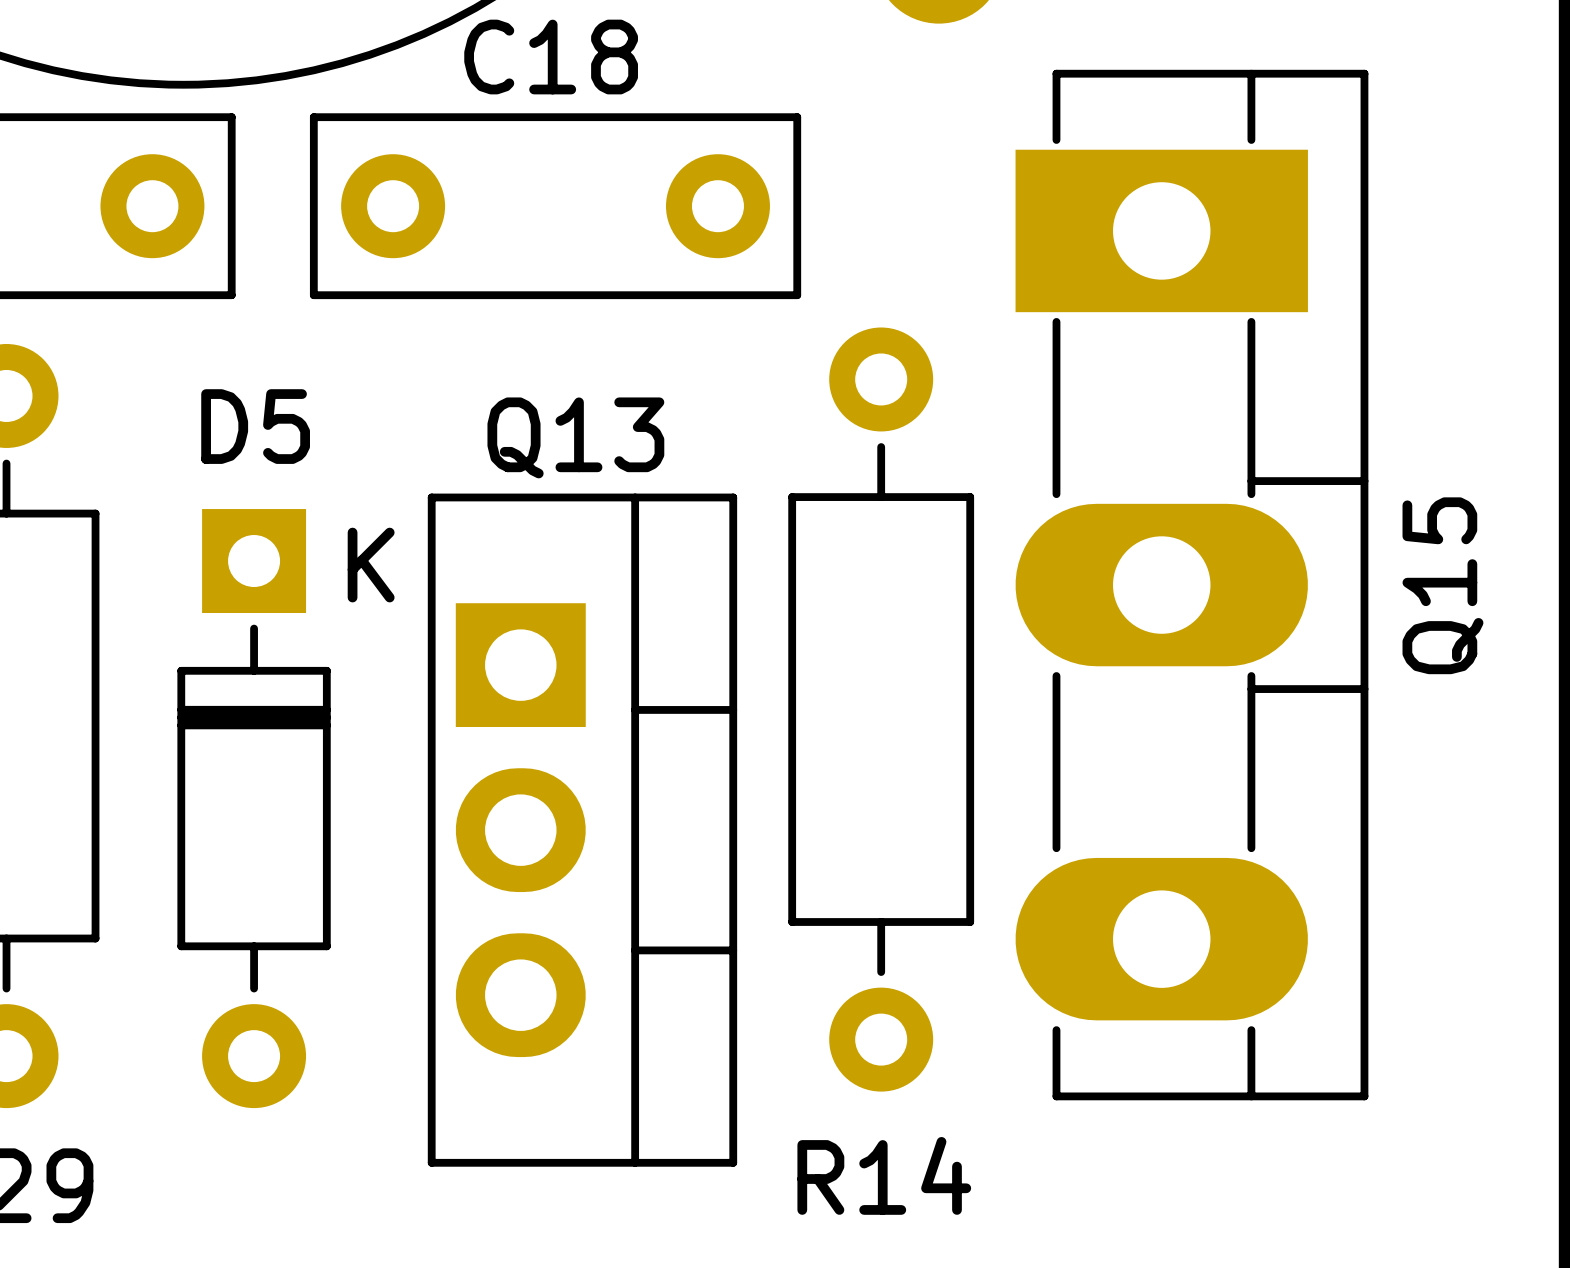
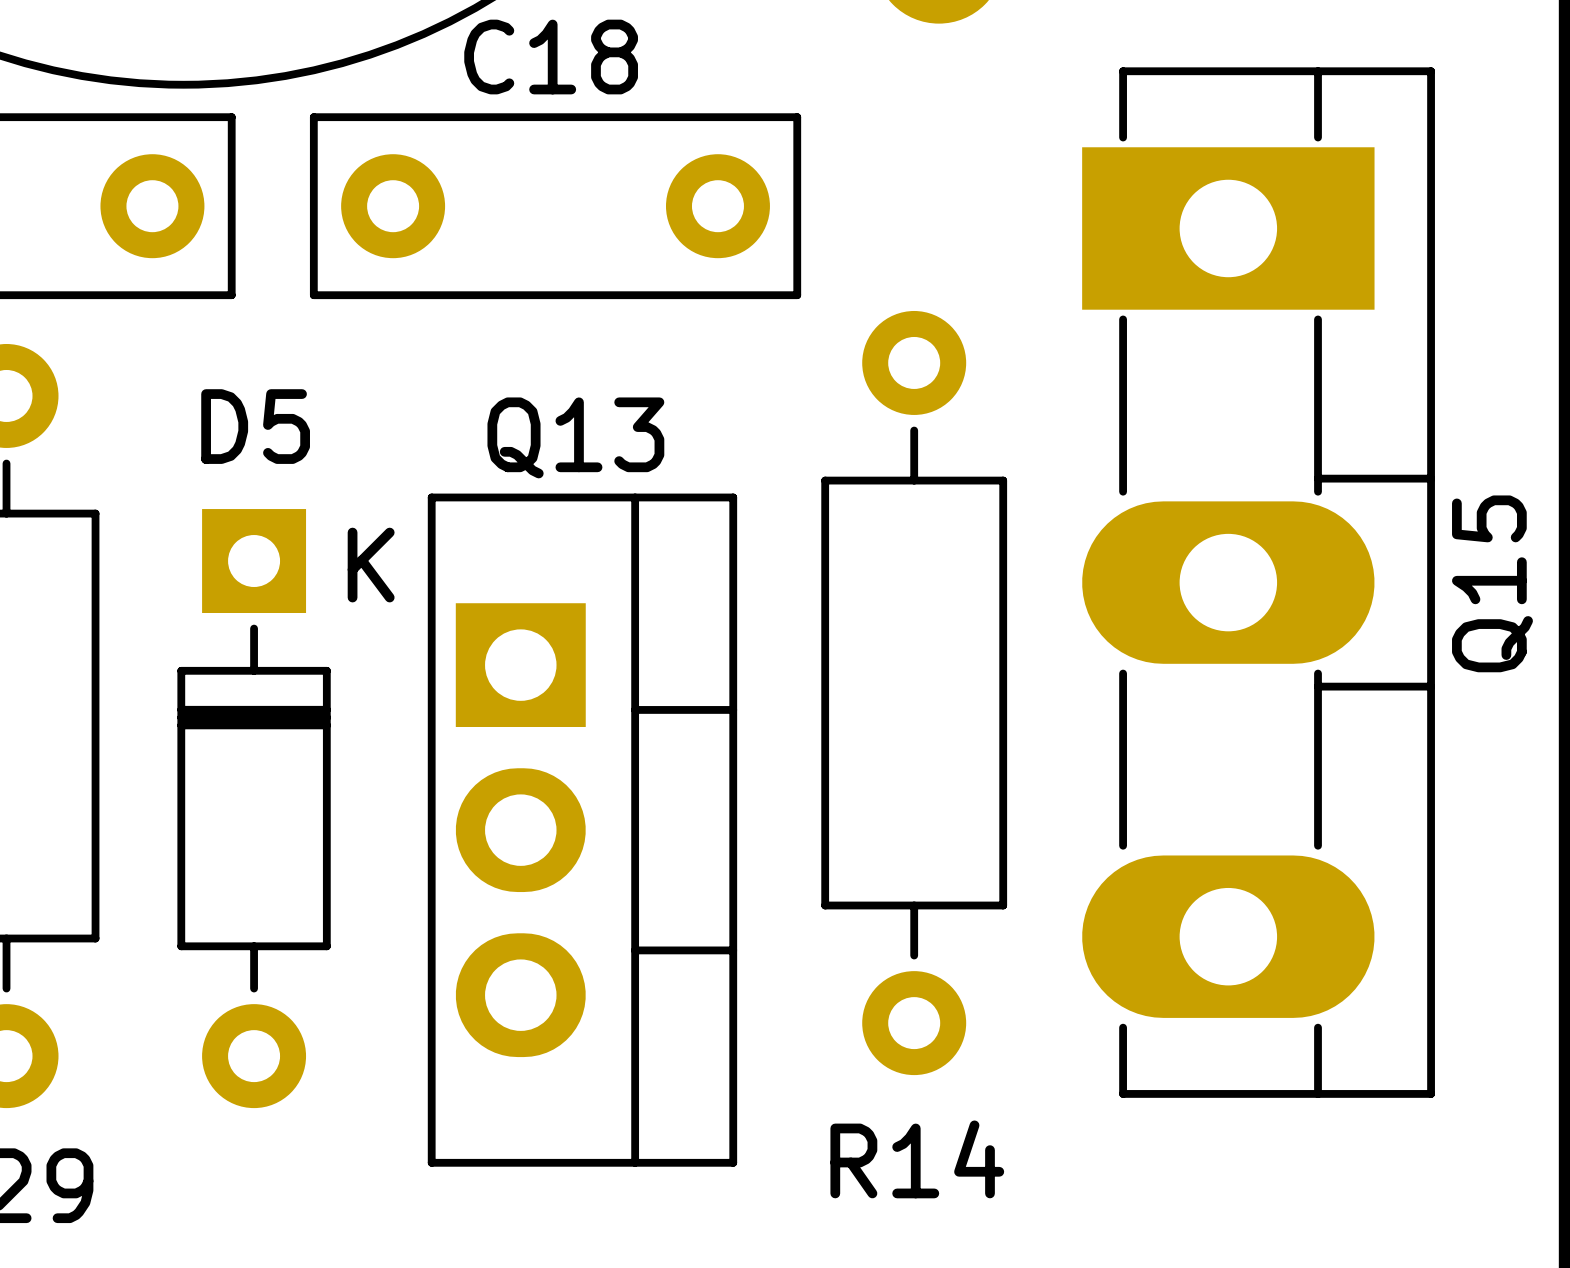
Q15 position: (1191, 585) -> (1258, 582)
Q15 name position: Q15 (1442, 585) -> Q15 (1492, 583)
R14 position: (881, 709) -> (914, 693)

